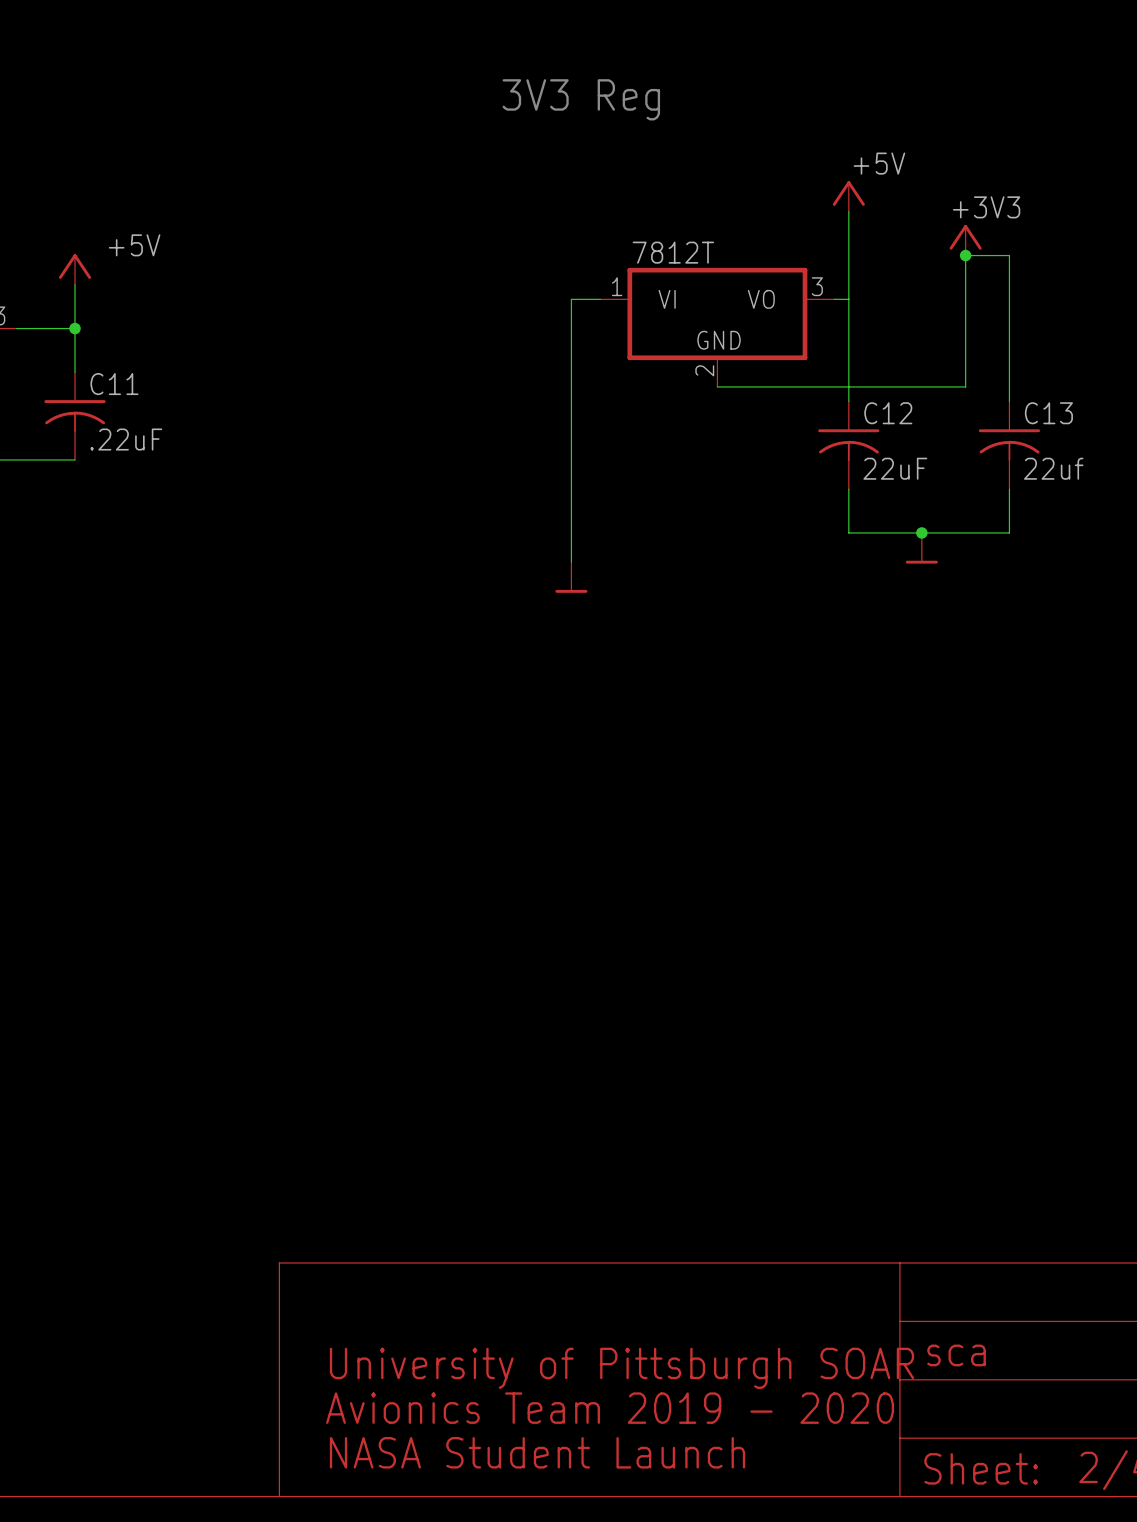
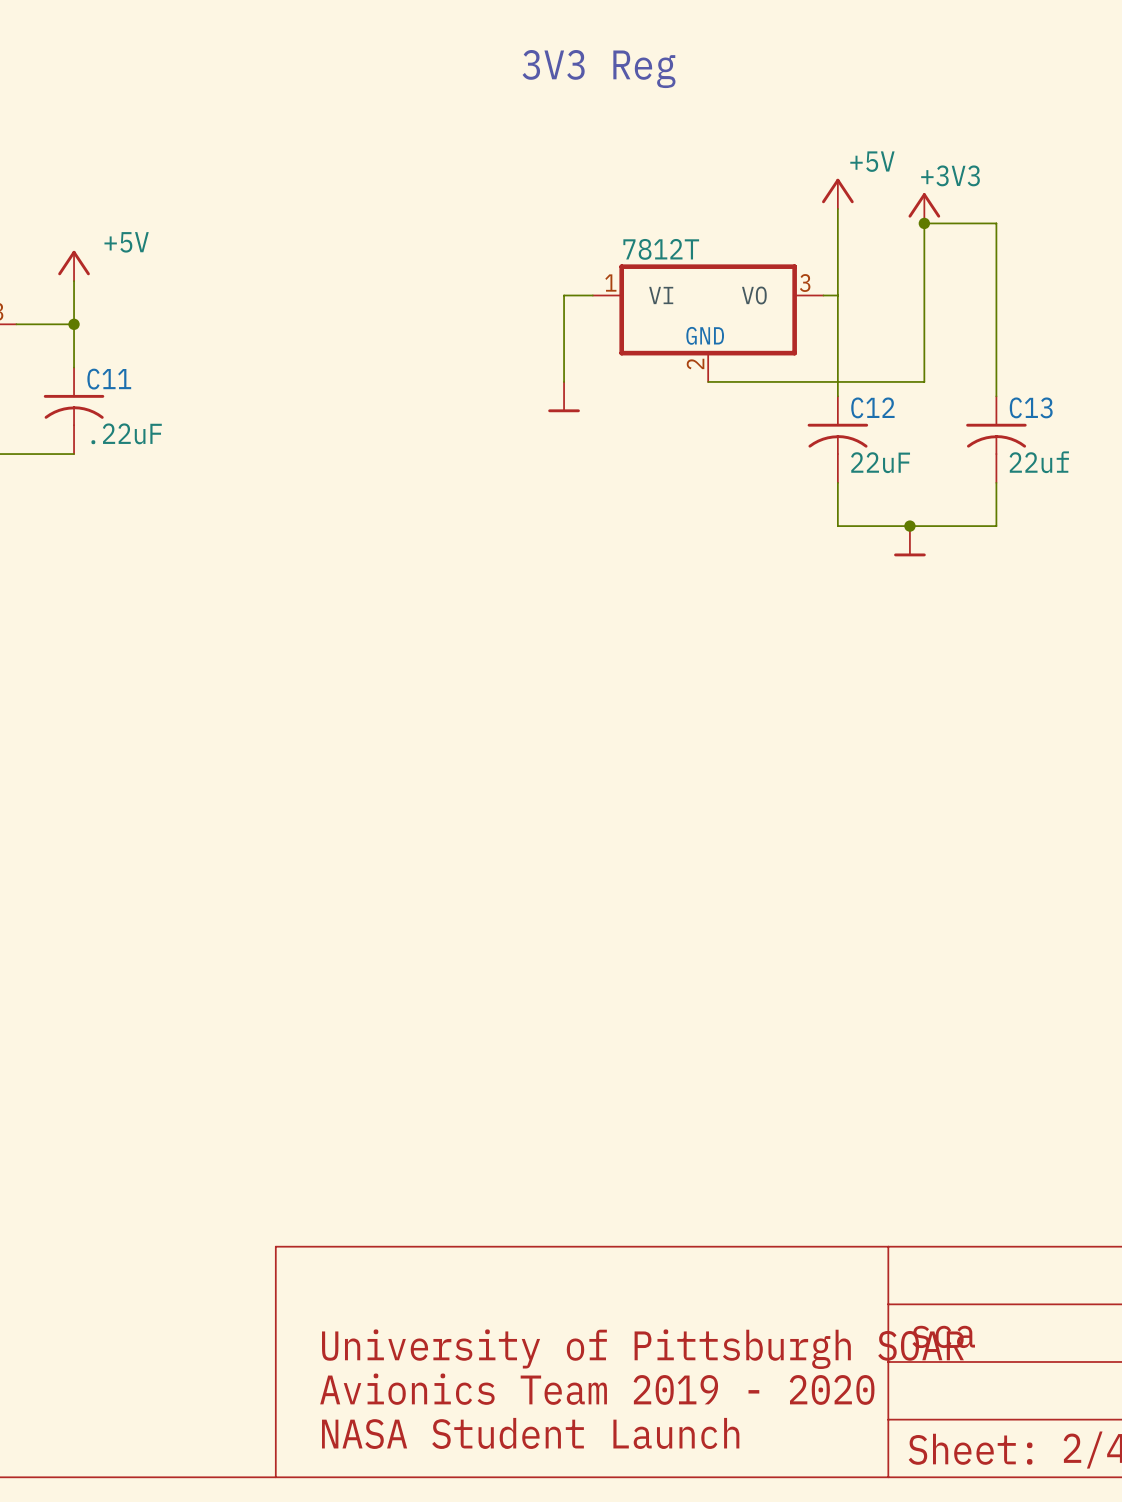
text position: 3V3 Reg (581, 99) -> 3V3 Reg (599, 69)
power symbol position: +3V3 (965, 240) -> +3V3 (924, 208)
junction position: (965, 255) -> (924, 223)
wire: (1009, 255) (965, 255) (965, 386) (936, 386) -> (996, 252) (996, 223) (924, 223) (924, 381)
wire: (571, 386) (571, 562) -> none
power symbol position: (571, 577) -> (564, 397)

